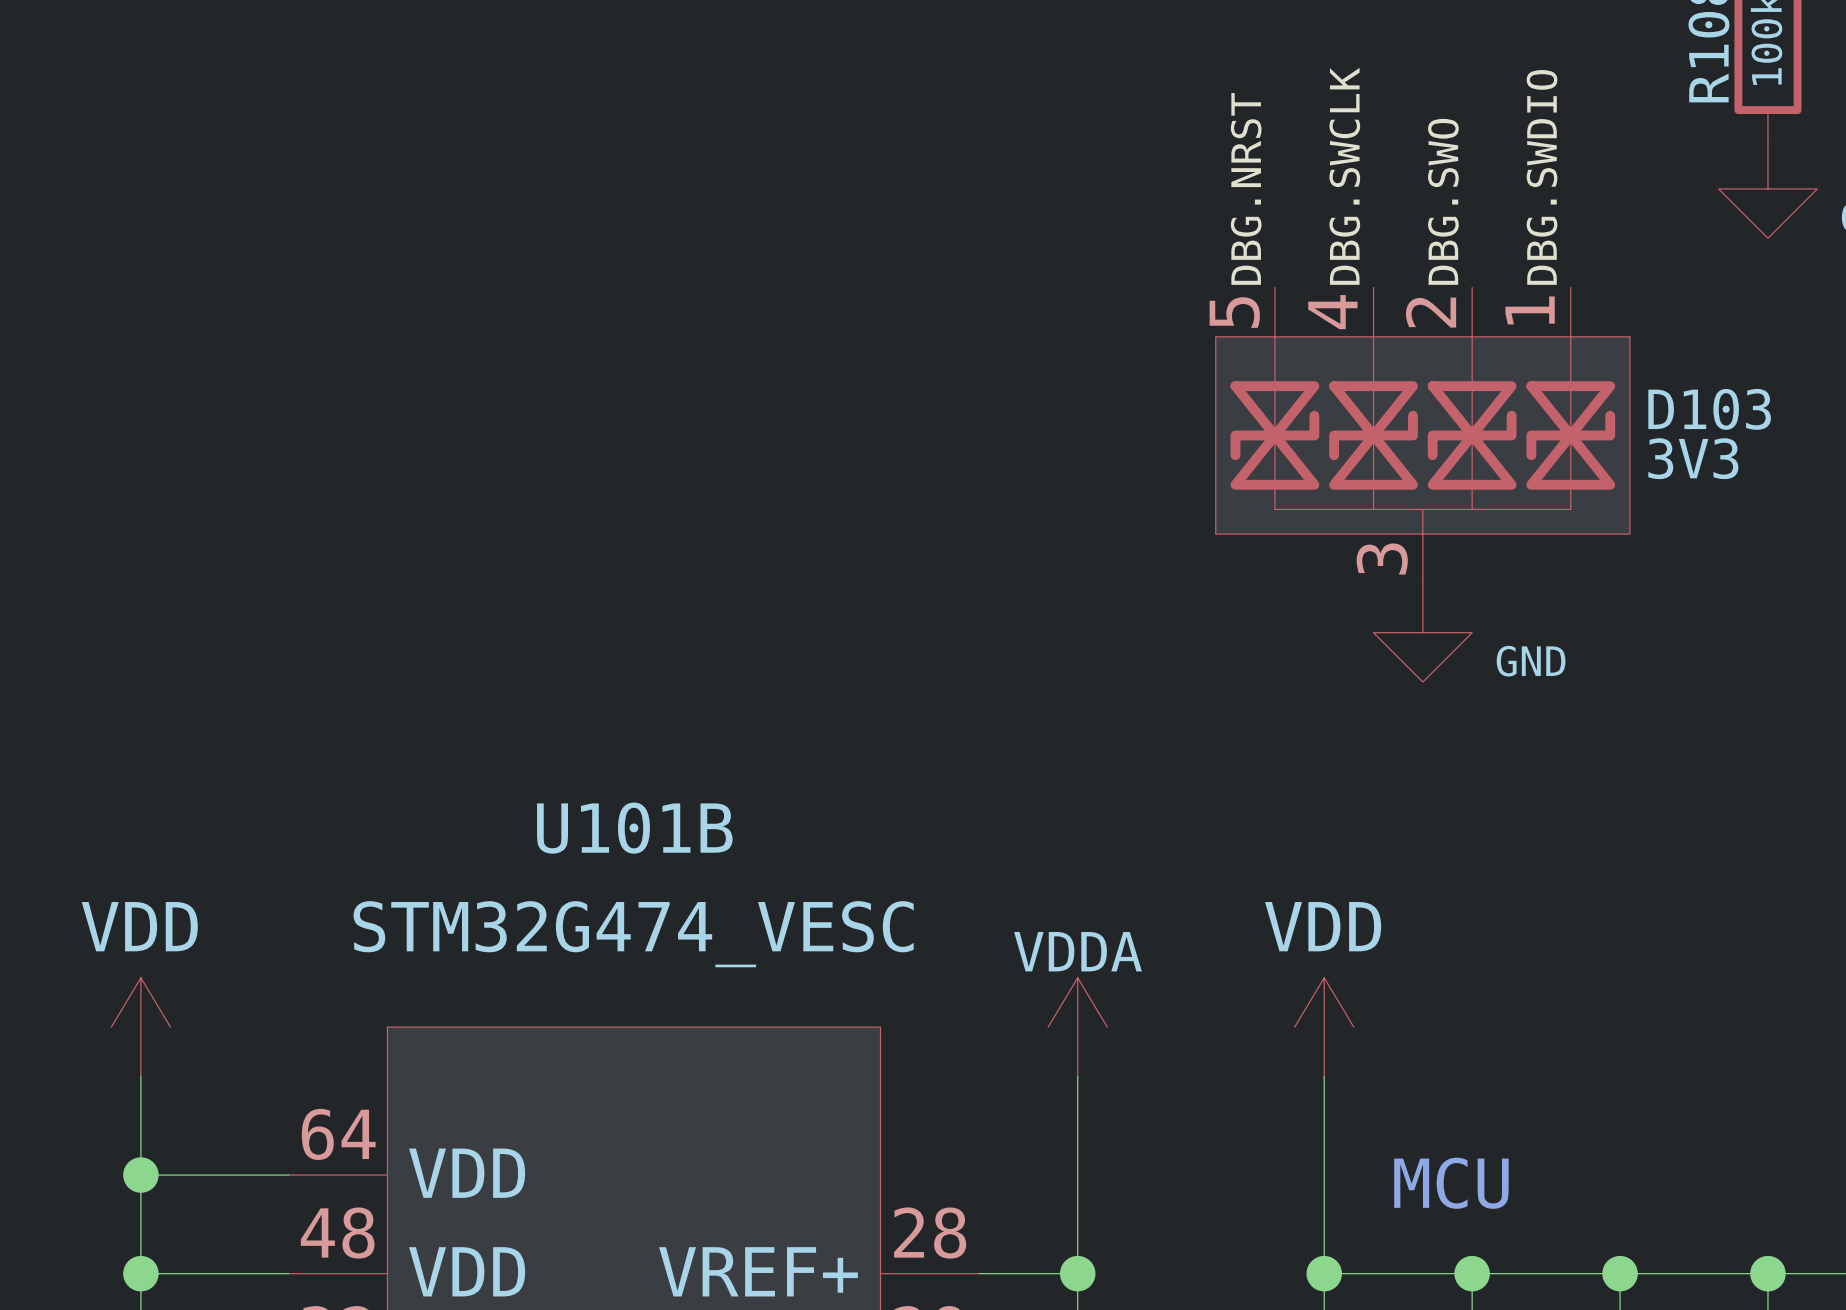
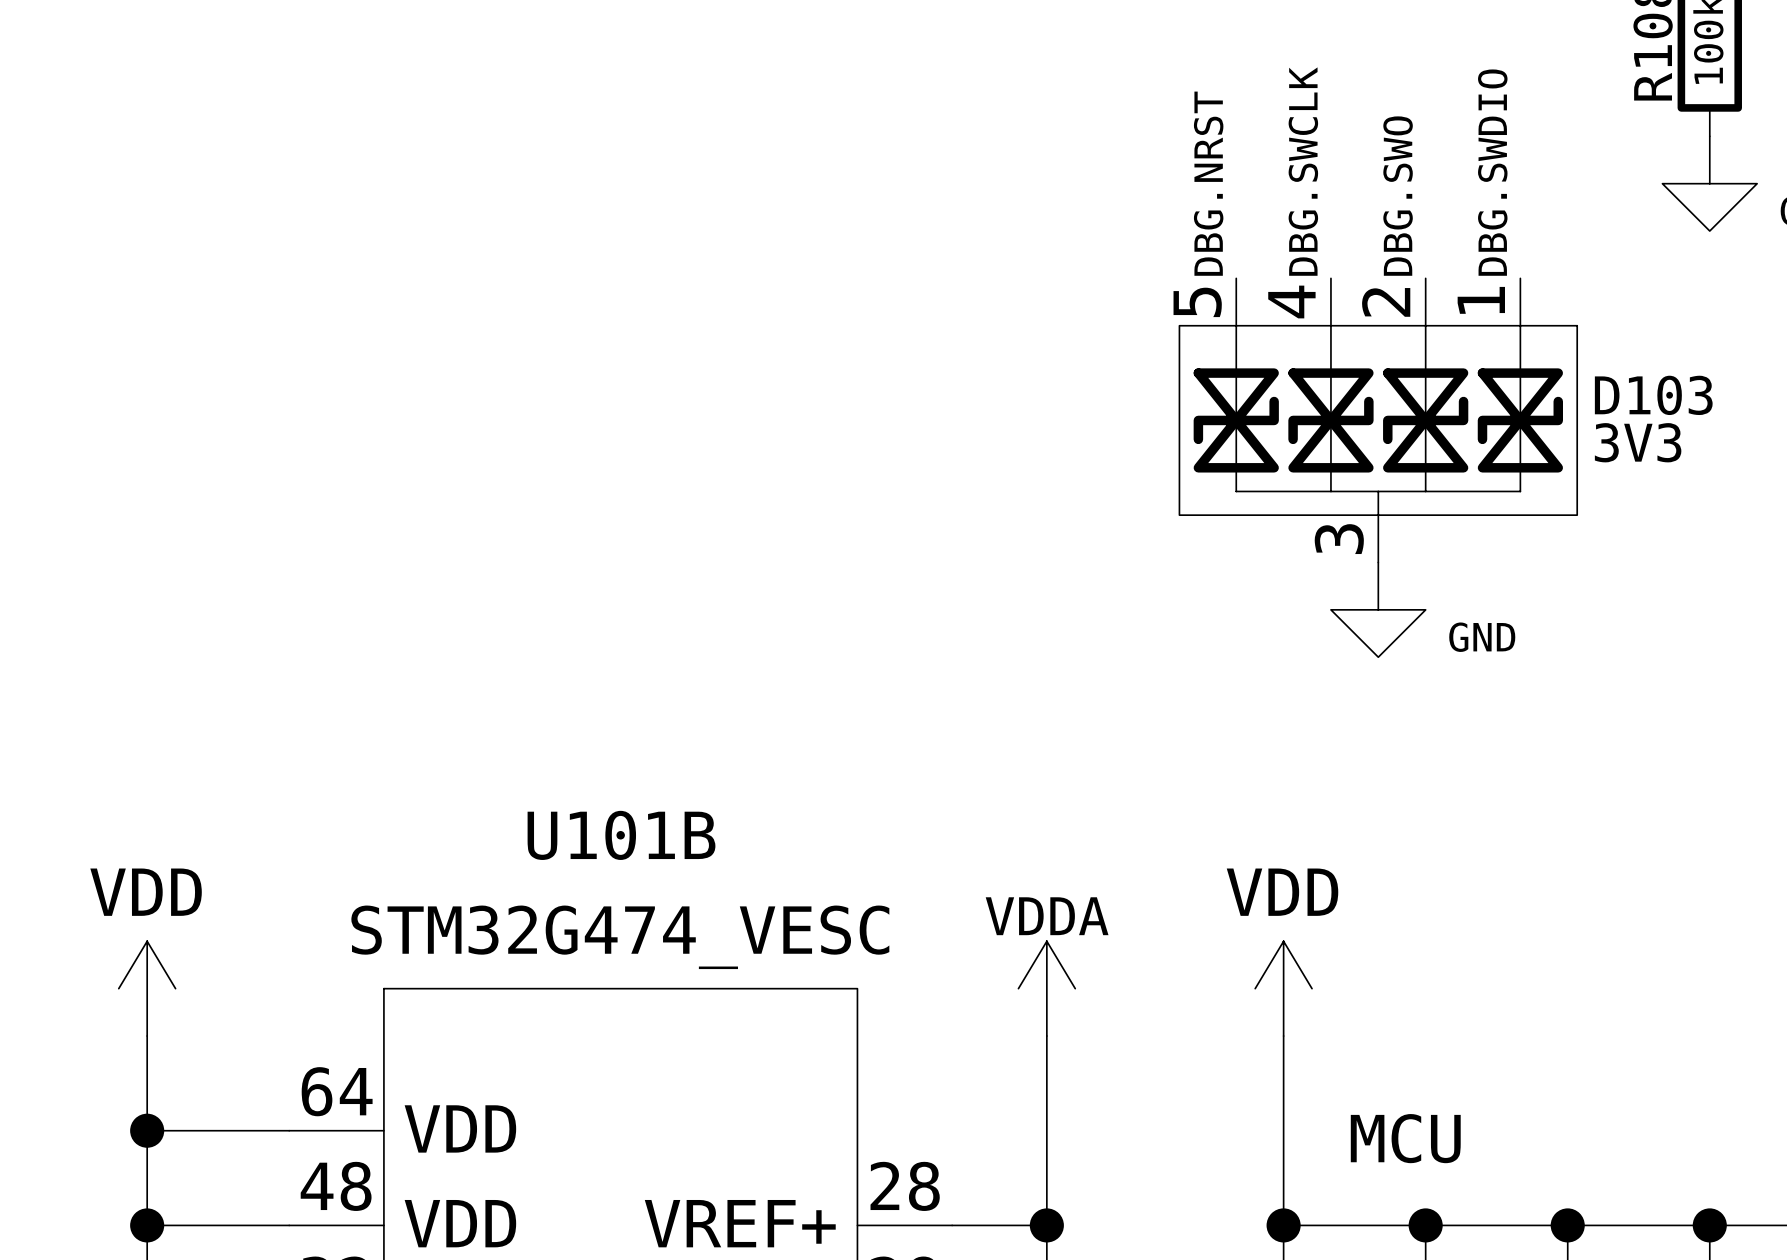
U101B name position: U101B (634, 828) -> U101B (621, 835)
U101B value position: STM32G474_VESC (633, 934) -> STM32G474_VESC (620, 937)

